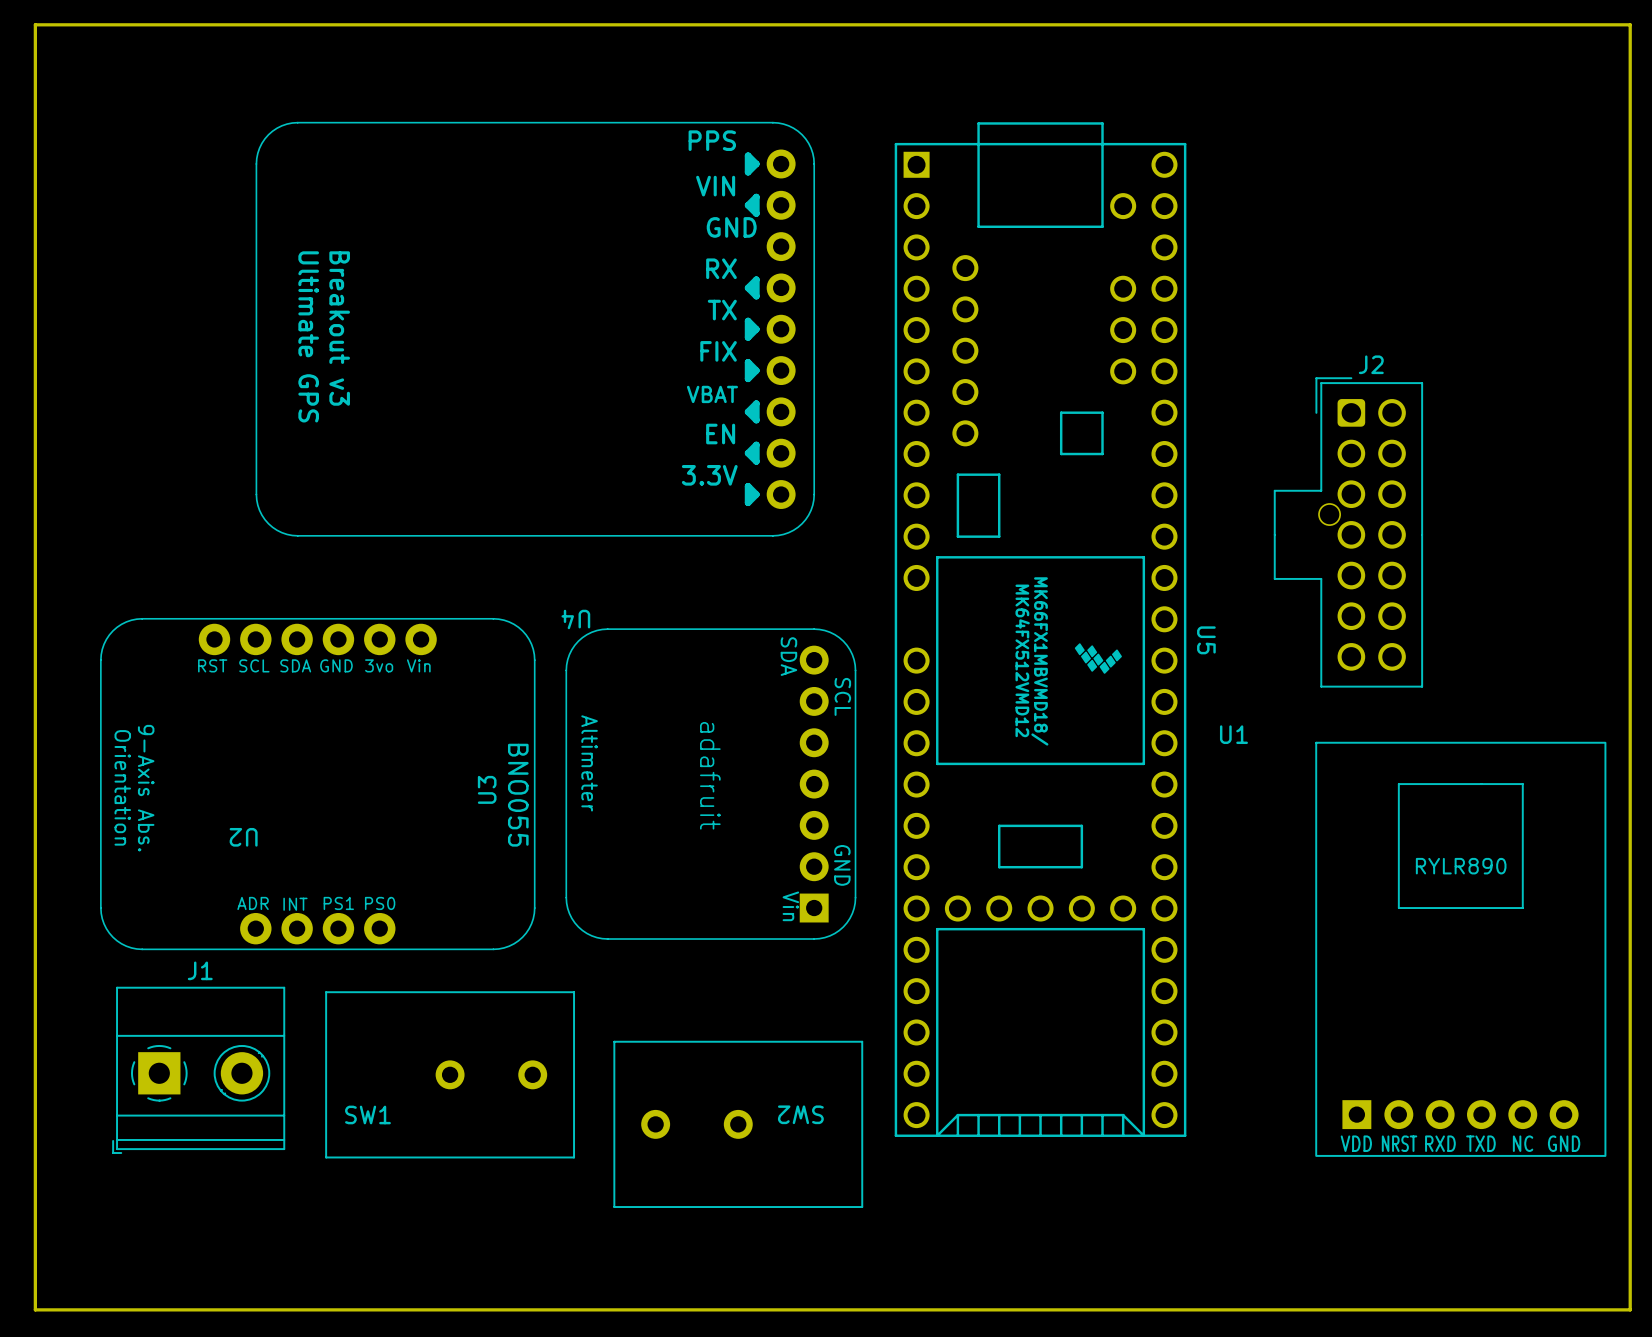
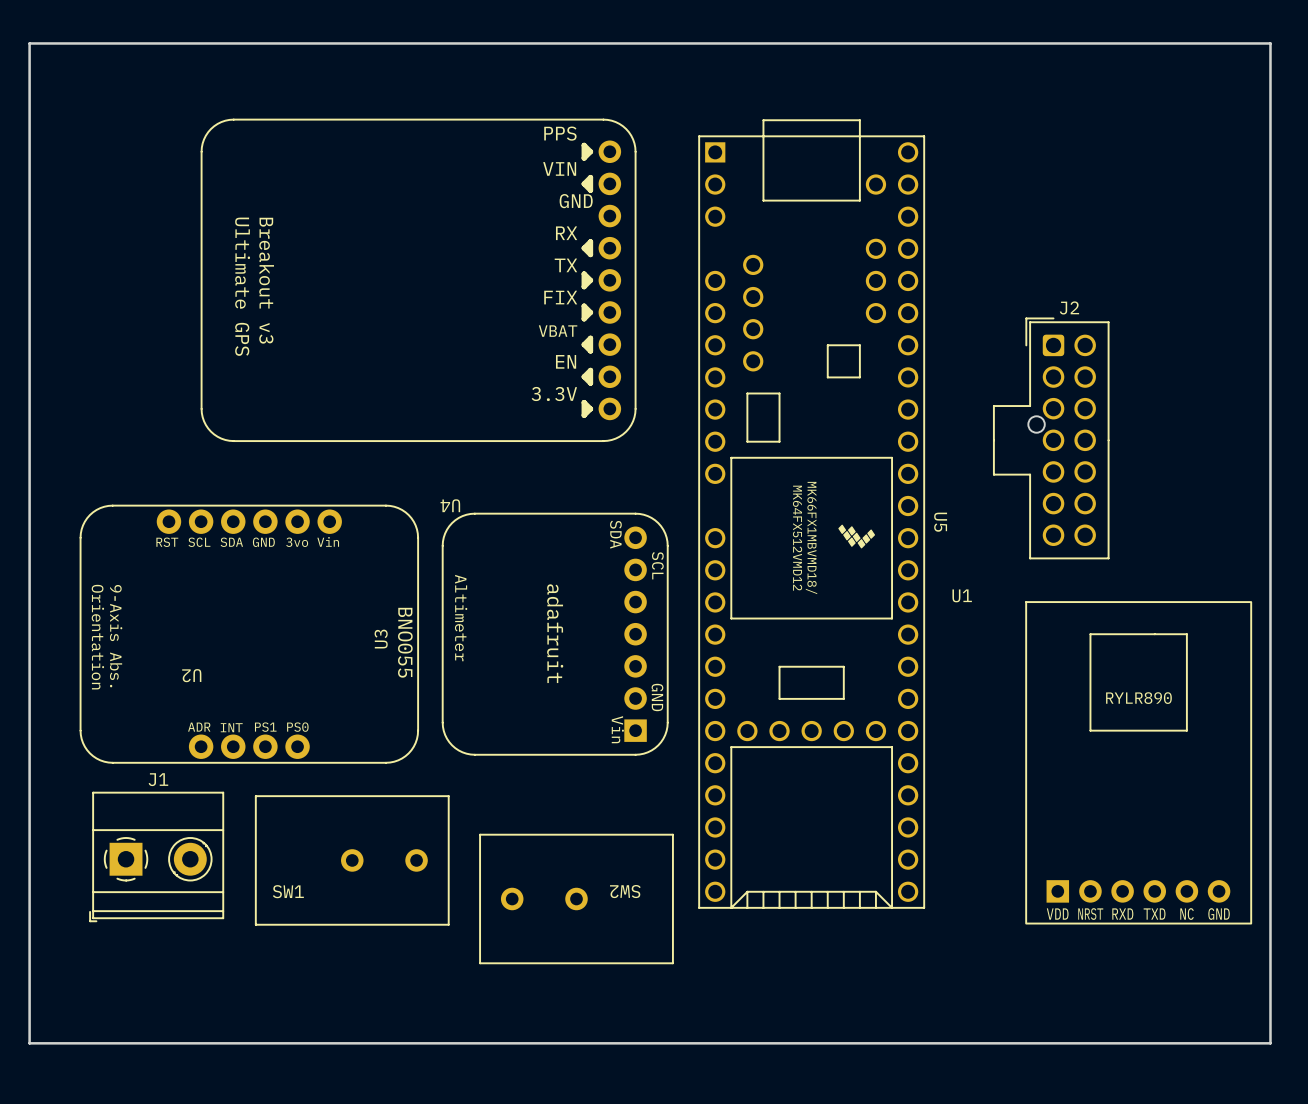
U5 footprint: [894, 122, 1187, 1137] -> [698, 119, 926, 909]

